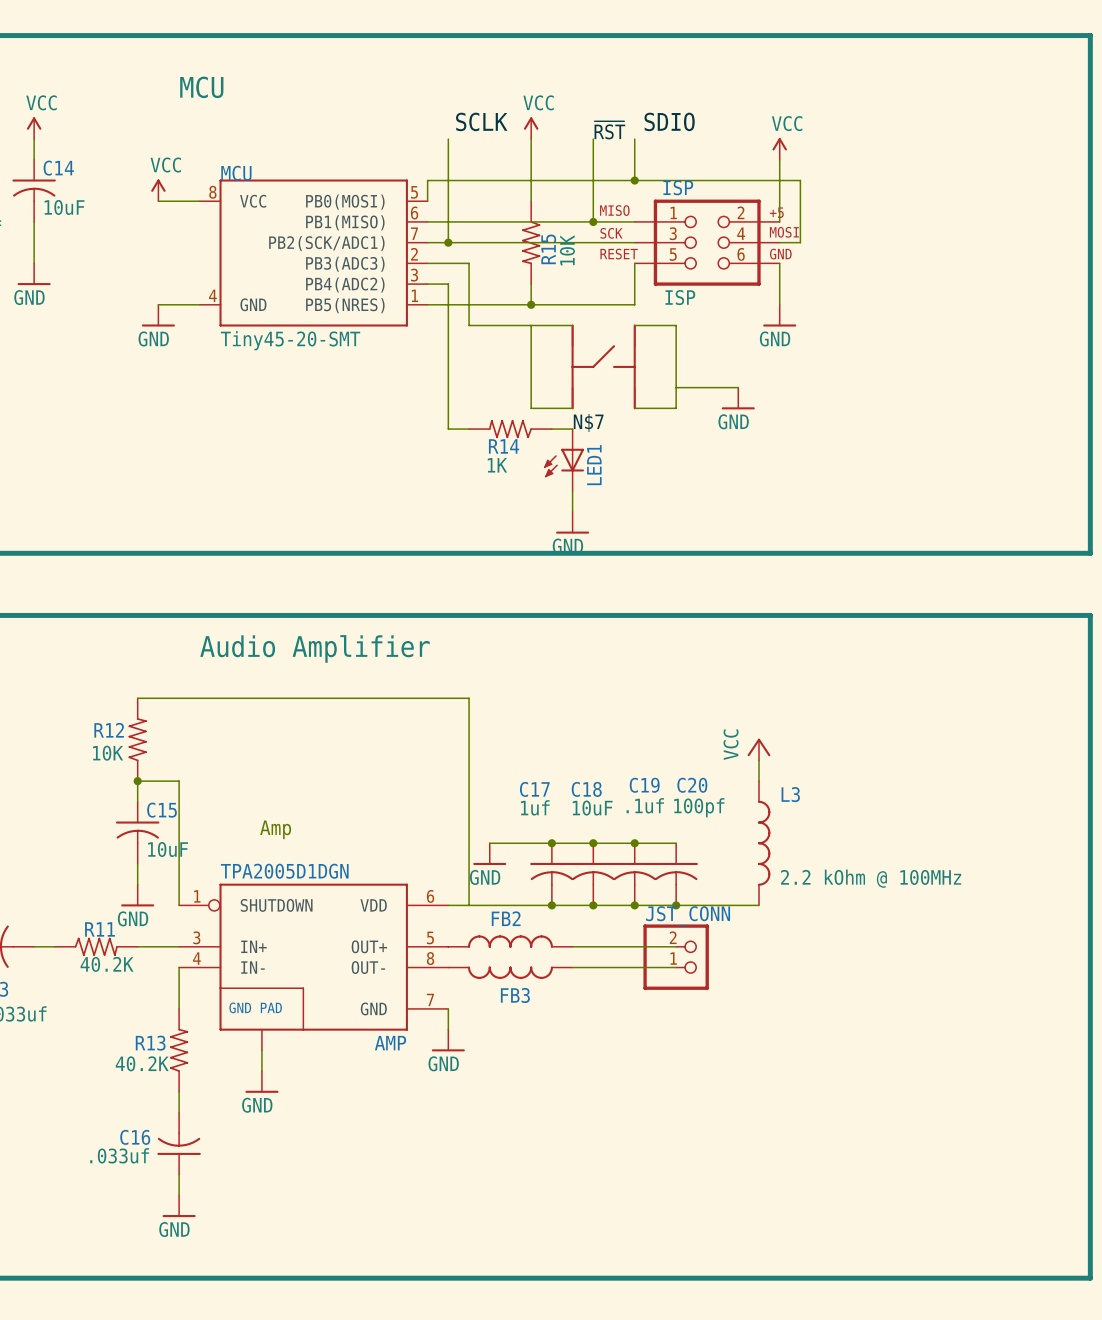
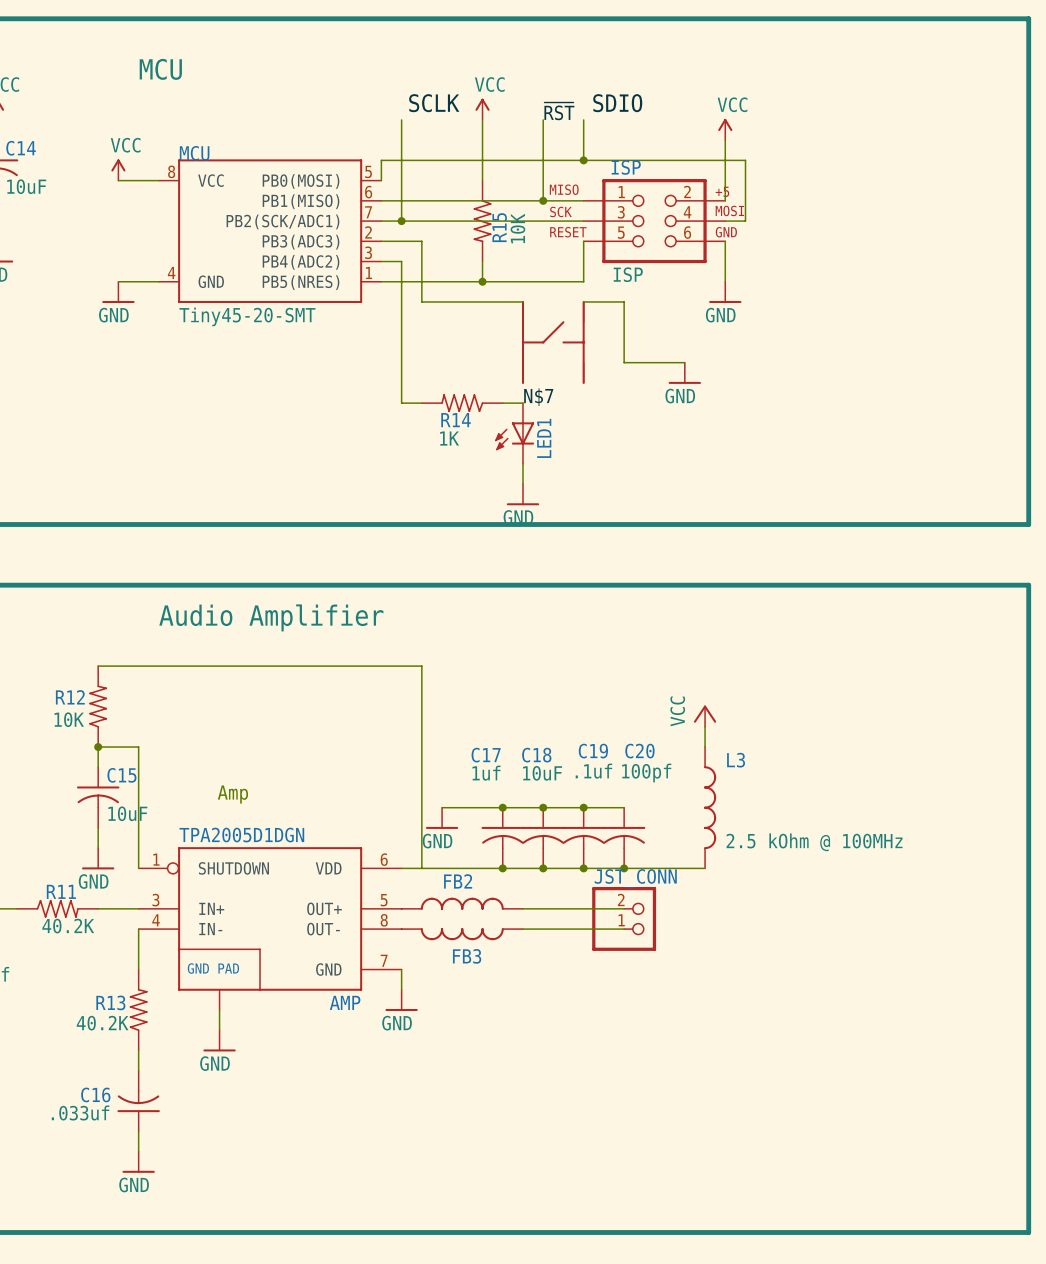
wire: (531, 325) (531, 408) (572, 408) -> none
wire: (676, 387) (676, 408) (634, 408) -> none
L3 value: 2.2 kOhm @ 100MHz (871, 878) -> 2.5 kOhm @ 100MHz (814, 842)

